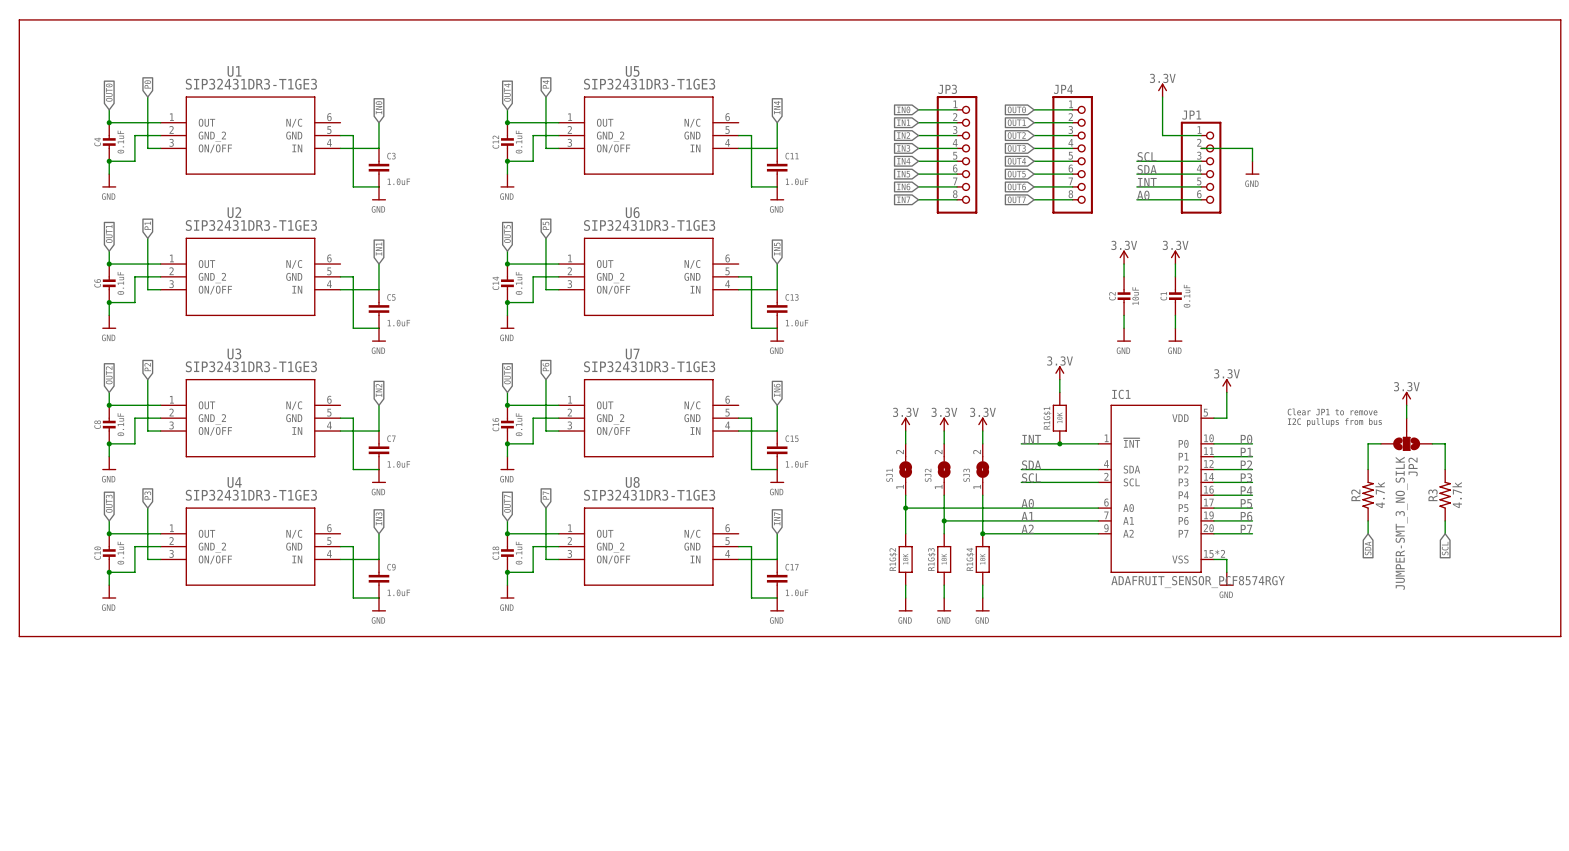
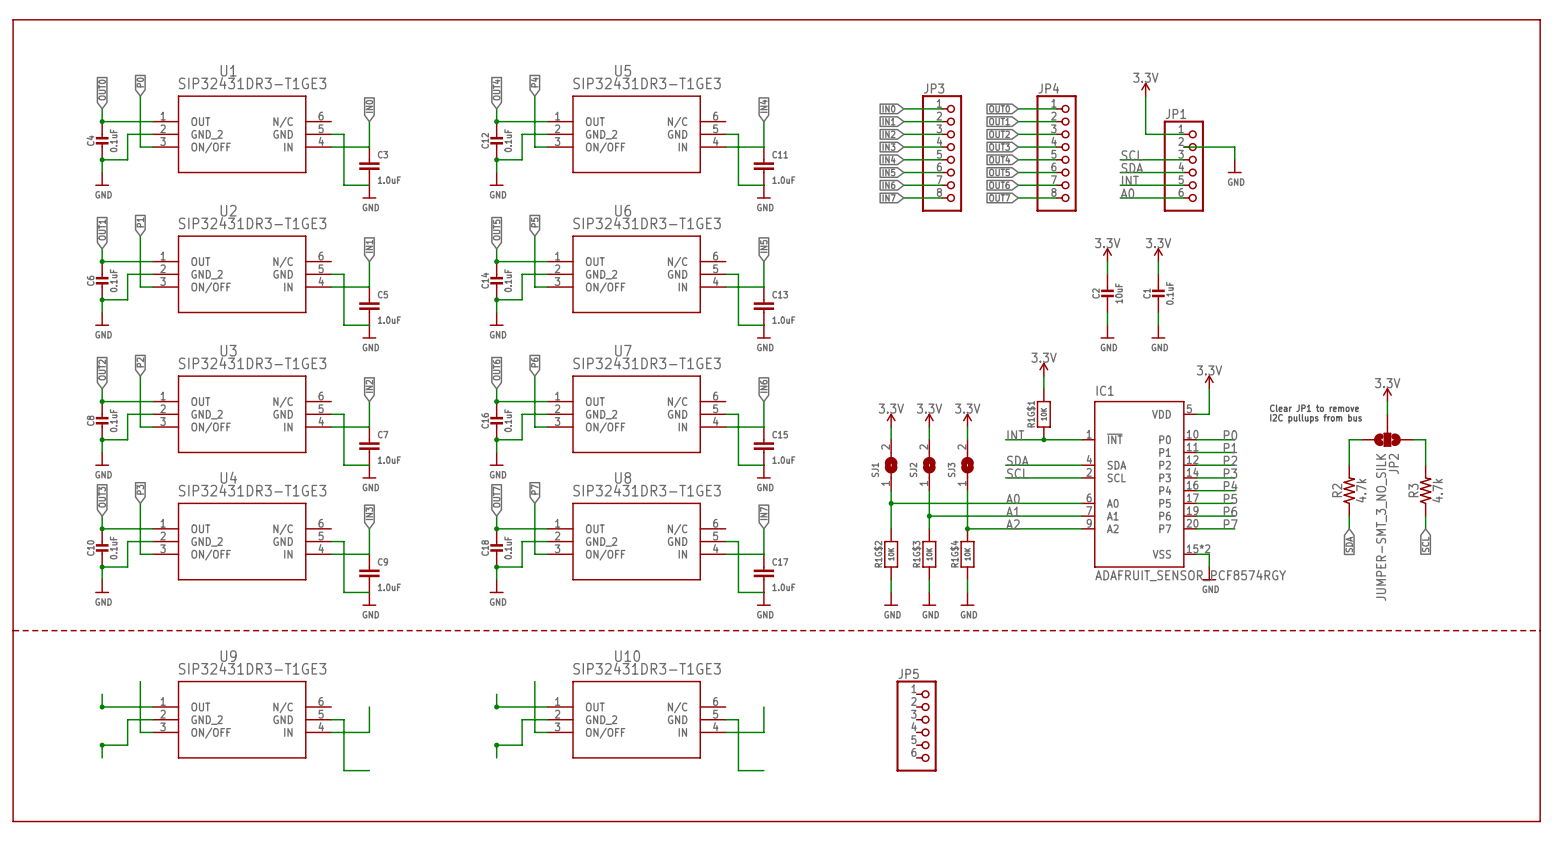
line: (19, 636) (1560, 636) -> (13, 630) (13, 821) (1540, 821) (1540, 630) (13, 630)
wire: none -> (140, 681) (140, 732) (153, 732)
wire: none -> (534, 681) (534, 732) (547, 732)
wire: none -> (102, 694) (102, 706) (153, 706)
wire: none -> (496, 694) (496, 706) (547, 706)
junction: none -> (102, 706)
wire: none -> (369, 706) (369, 732) (331, 732)
junction: none -> (496, 706)
wire: none -> (763, 706) (763, 732) (725, 732)
wire: none -> (153, 719) (127, 719) (127, 745) (102, 745) (102, 757)
U9: none -> SIP32431DR3-T1GE3 (242, 719)
wire: none -> (331, 719) (343, 719) (343, 770) (369, 770)
wire: none -> (547, 719) (522, 719) (522, 745) (496, 745) (496, 757)
U10: none -> SIP32431DR3-T1GE3 (636, 719)
wire: none -> (725, 719) (738, 719) (738, 770) (763, 770)
JP5: none -> (916, 726)
junction: none -> (102, 745)
junction: none -> (496, 745)

